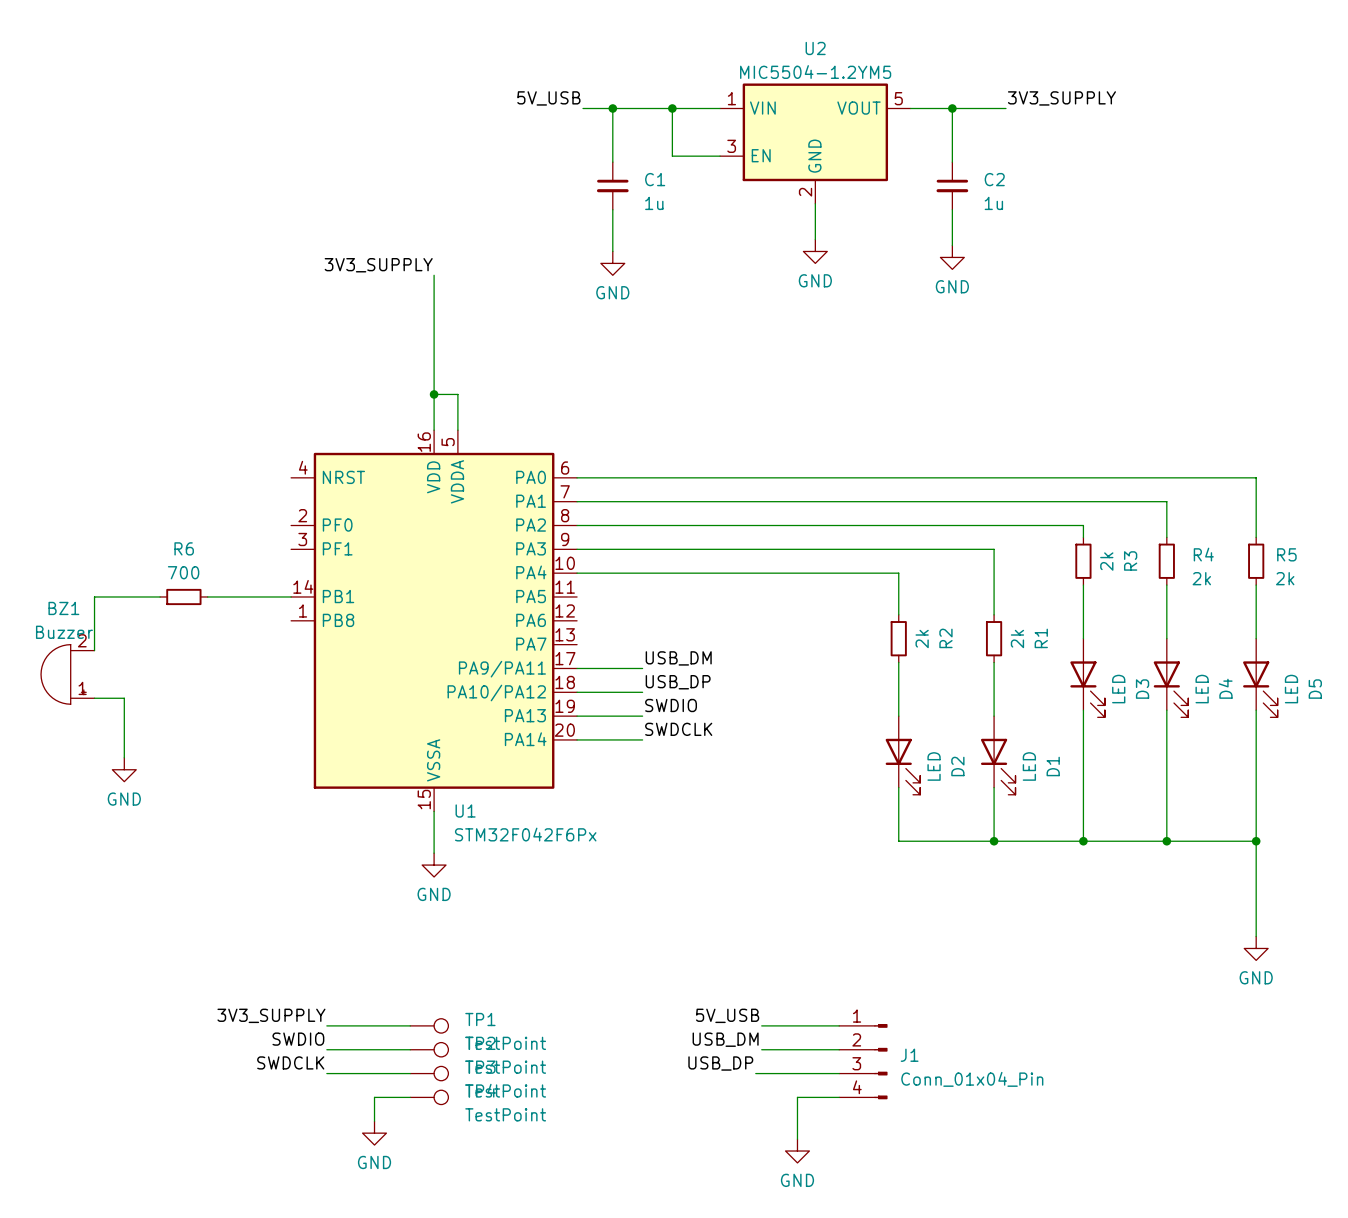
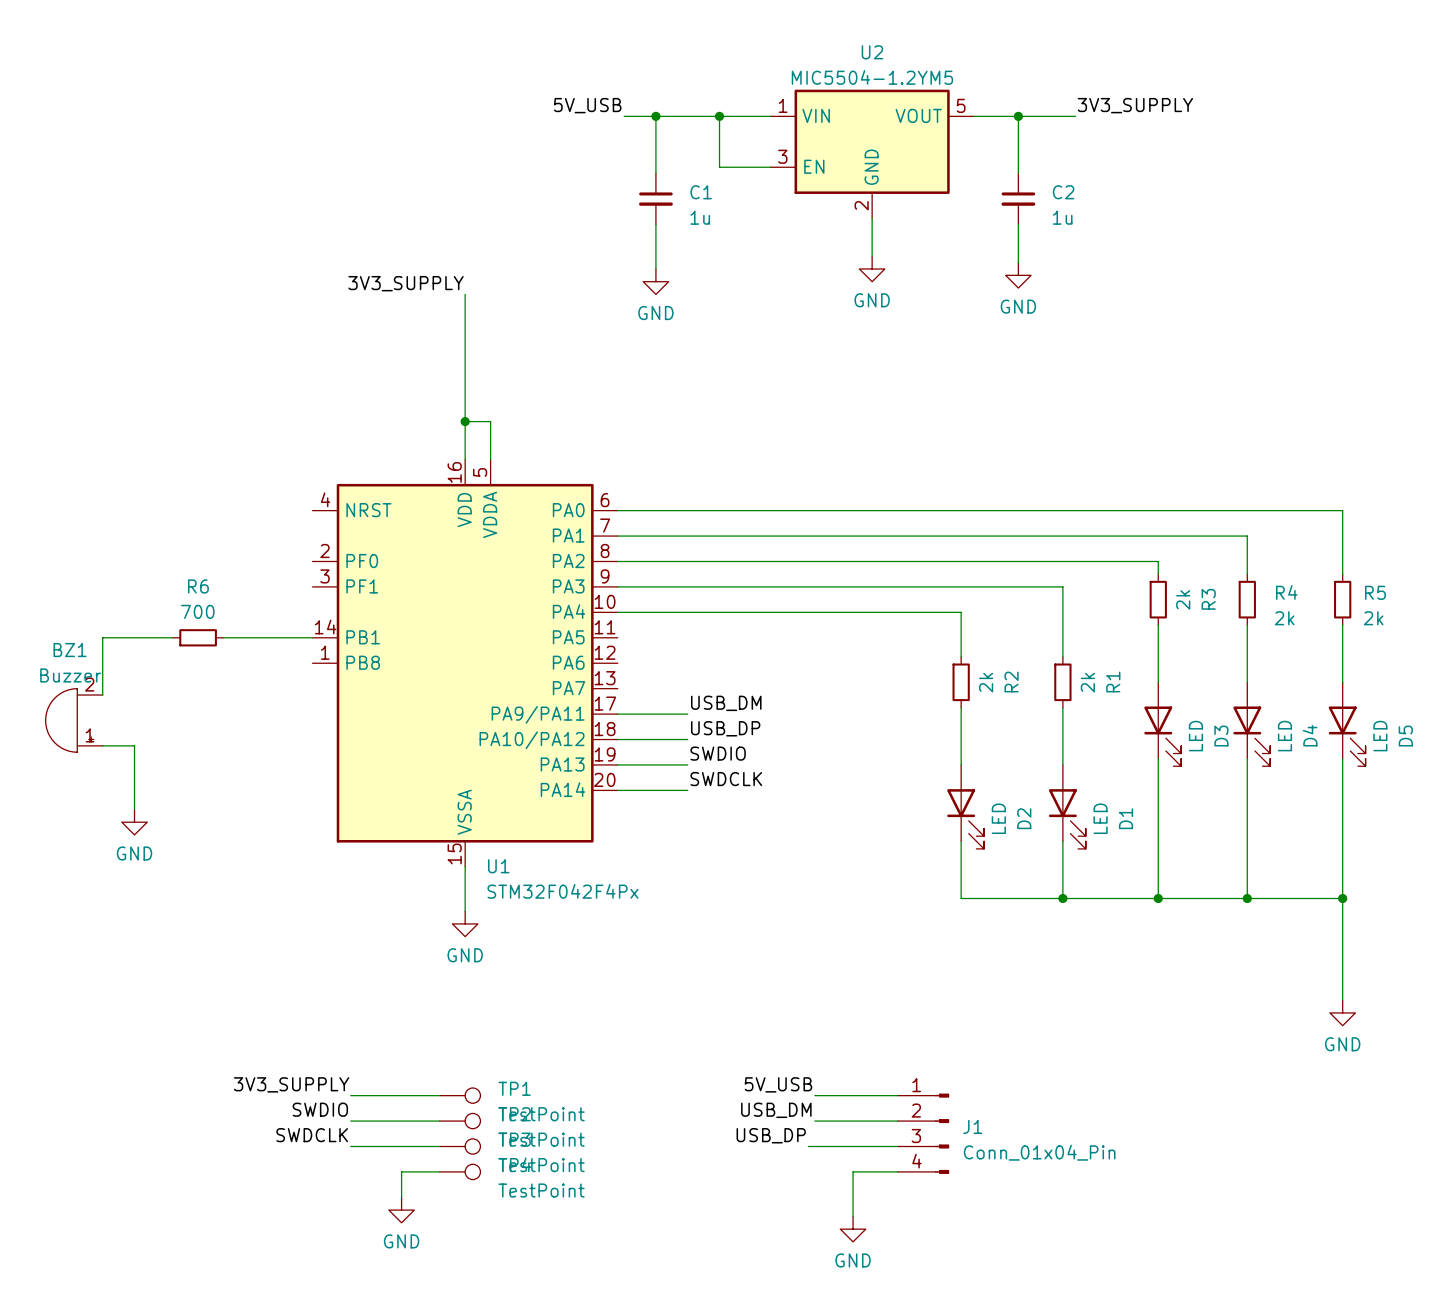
U1 value: STM32F042F6Px (525, 834) -> STM32F042F4Px (562, 891)

